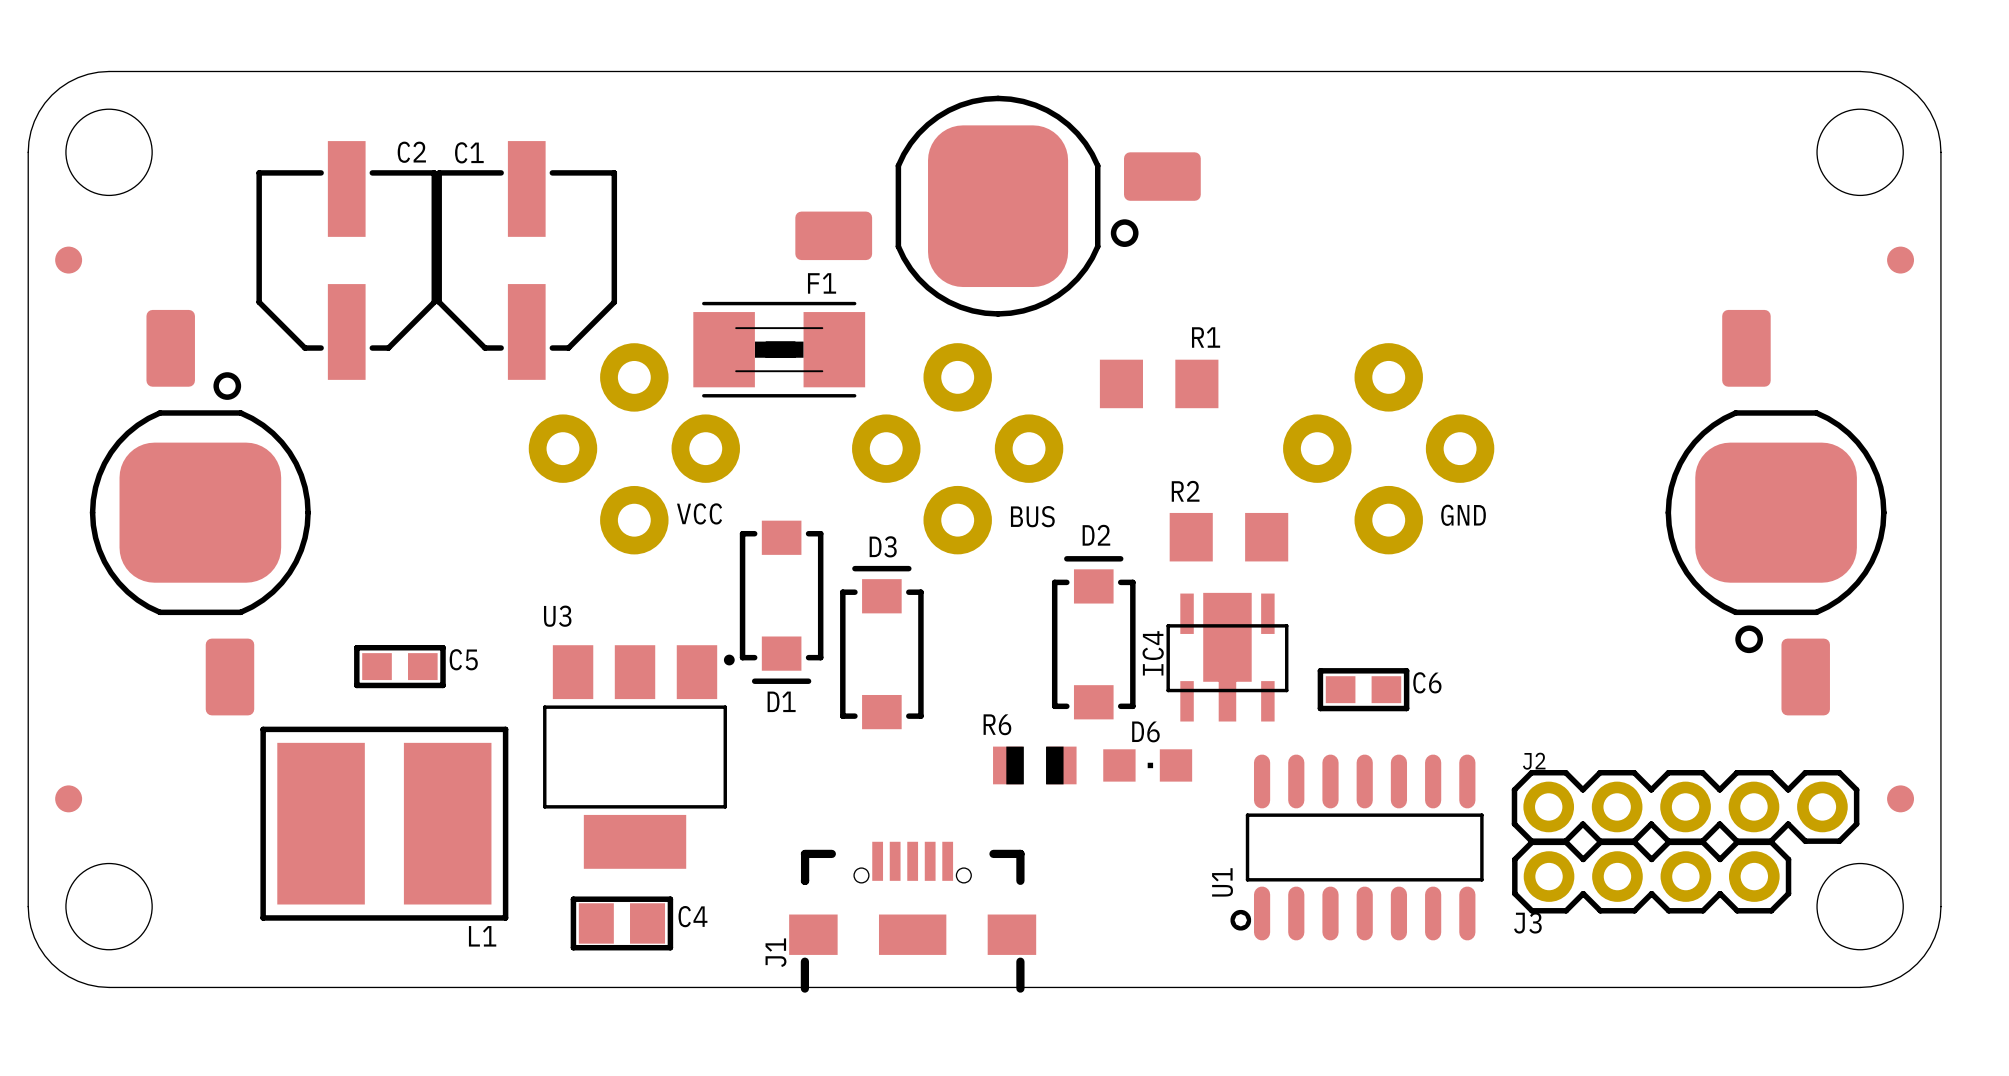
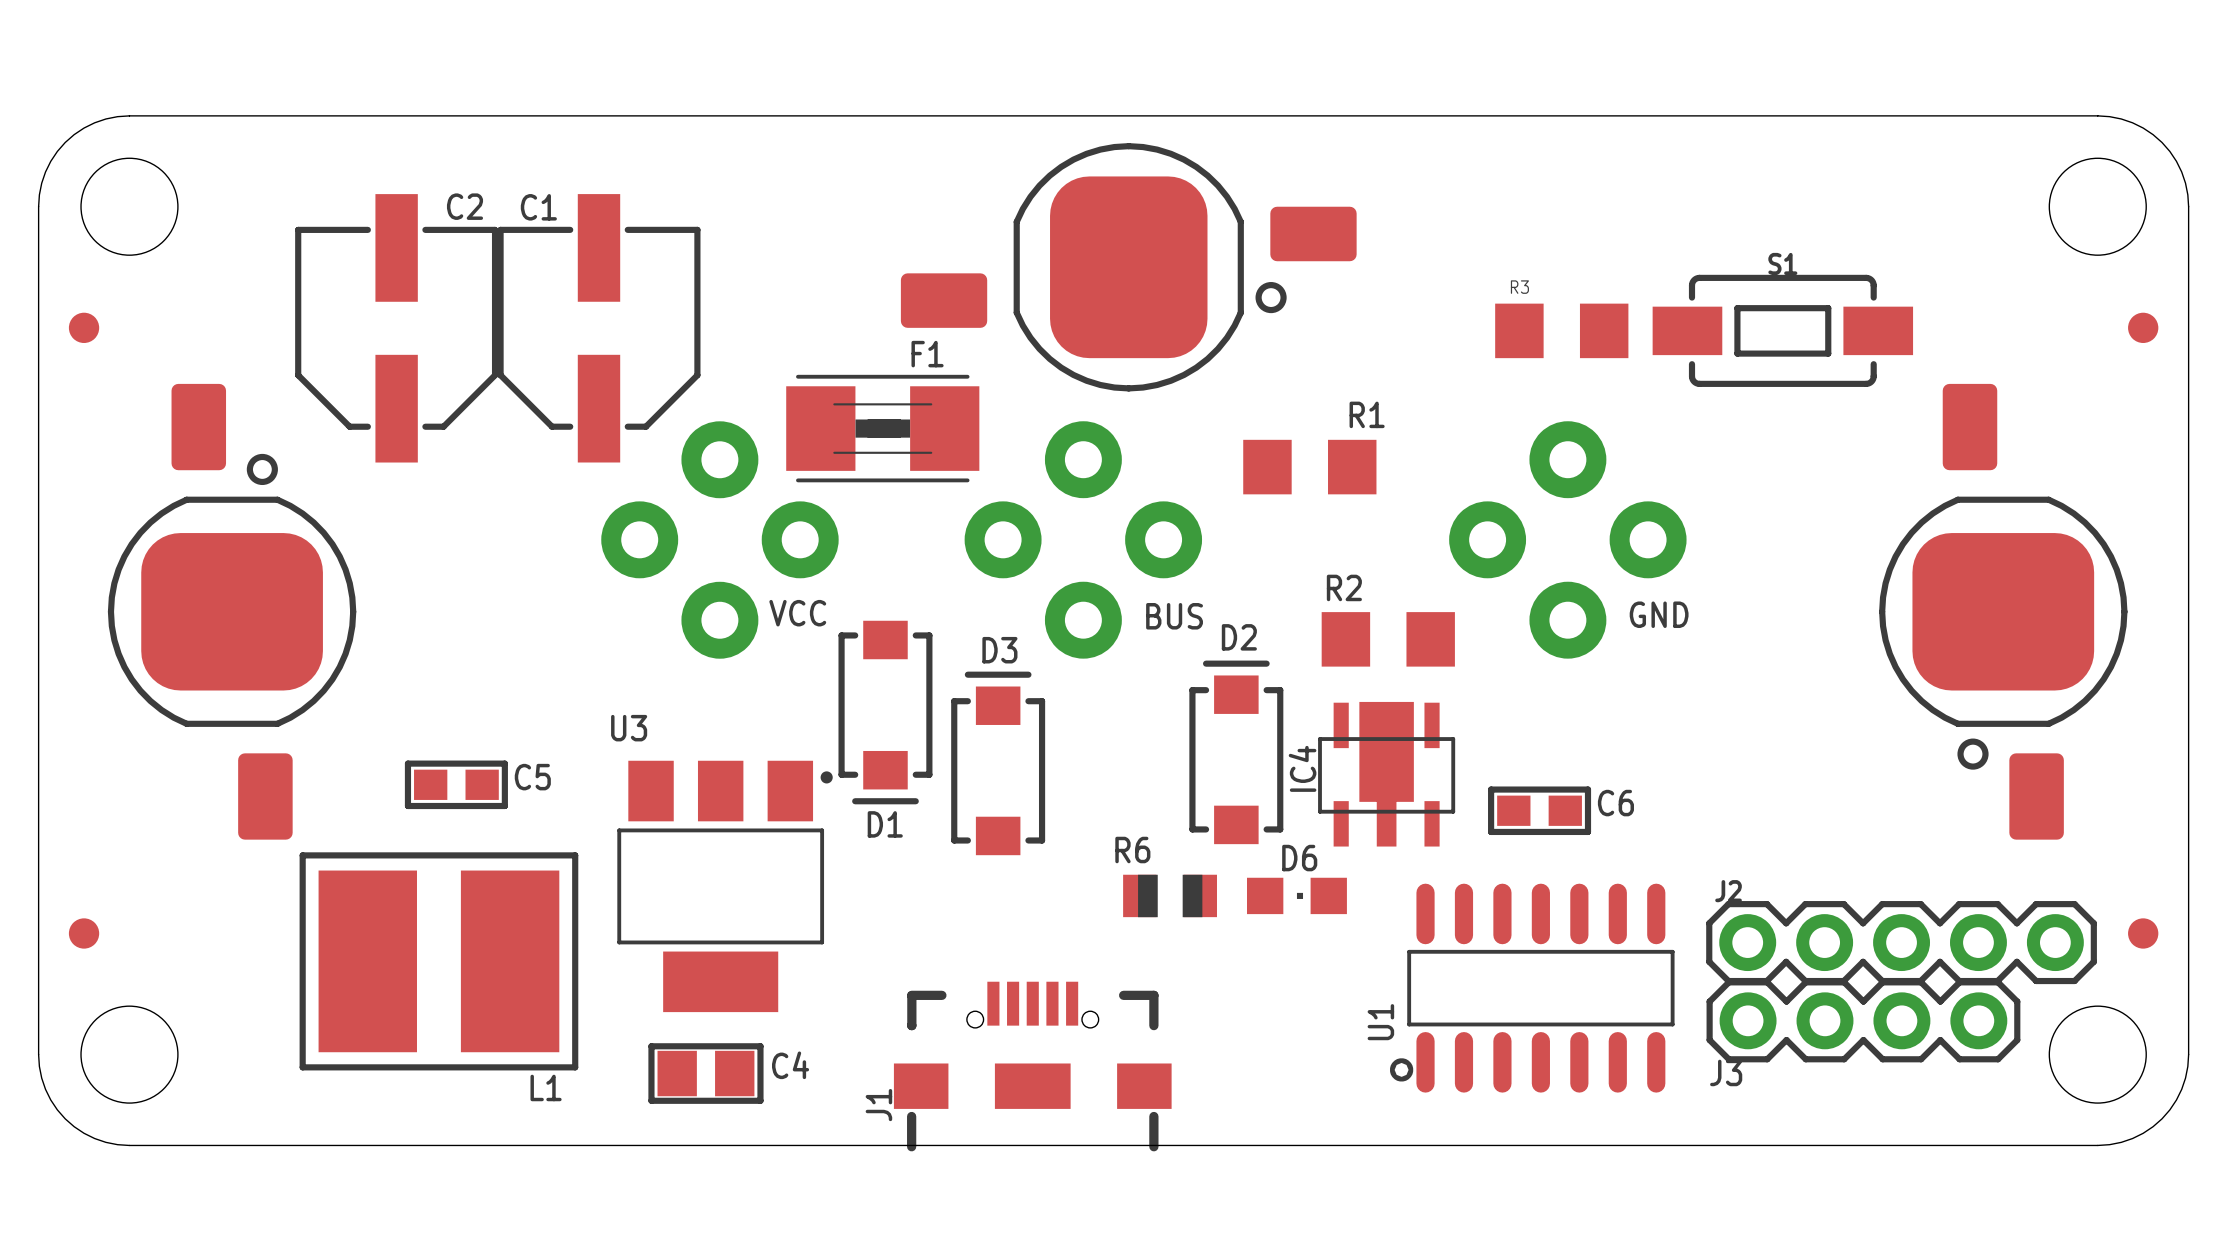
R3: none -> (1561, 330)
S1: none -> (1782, 330)

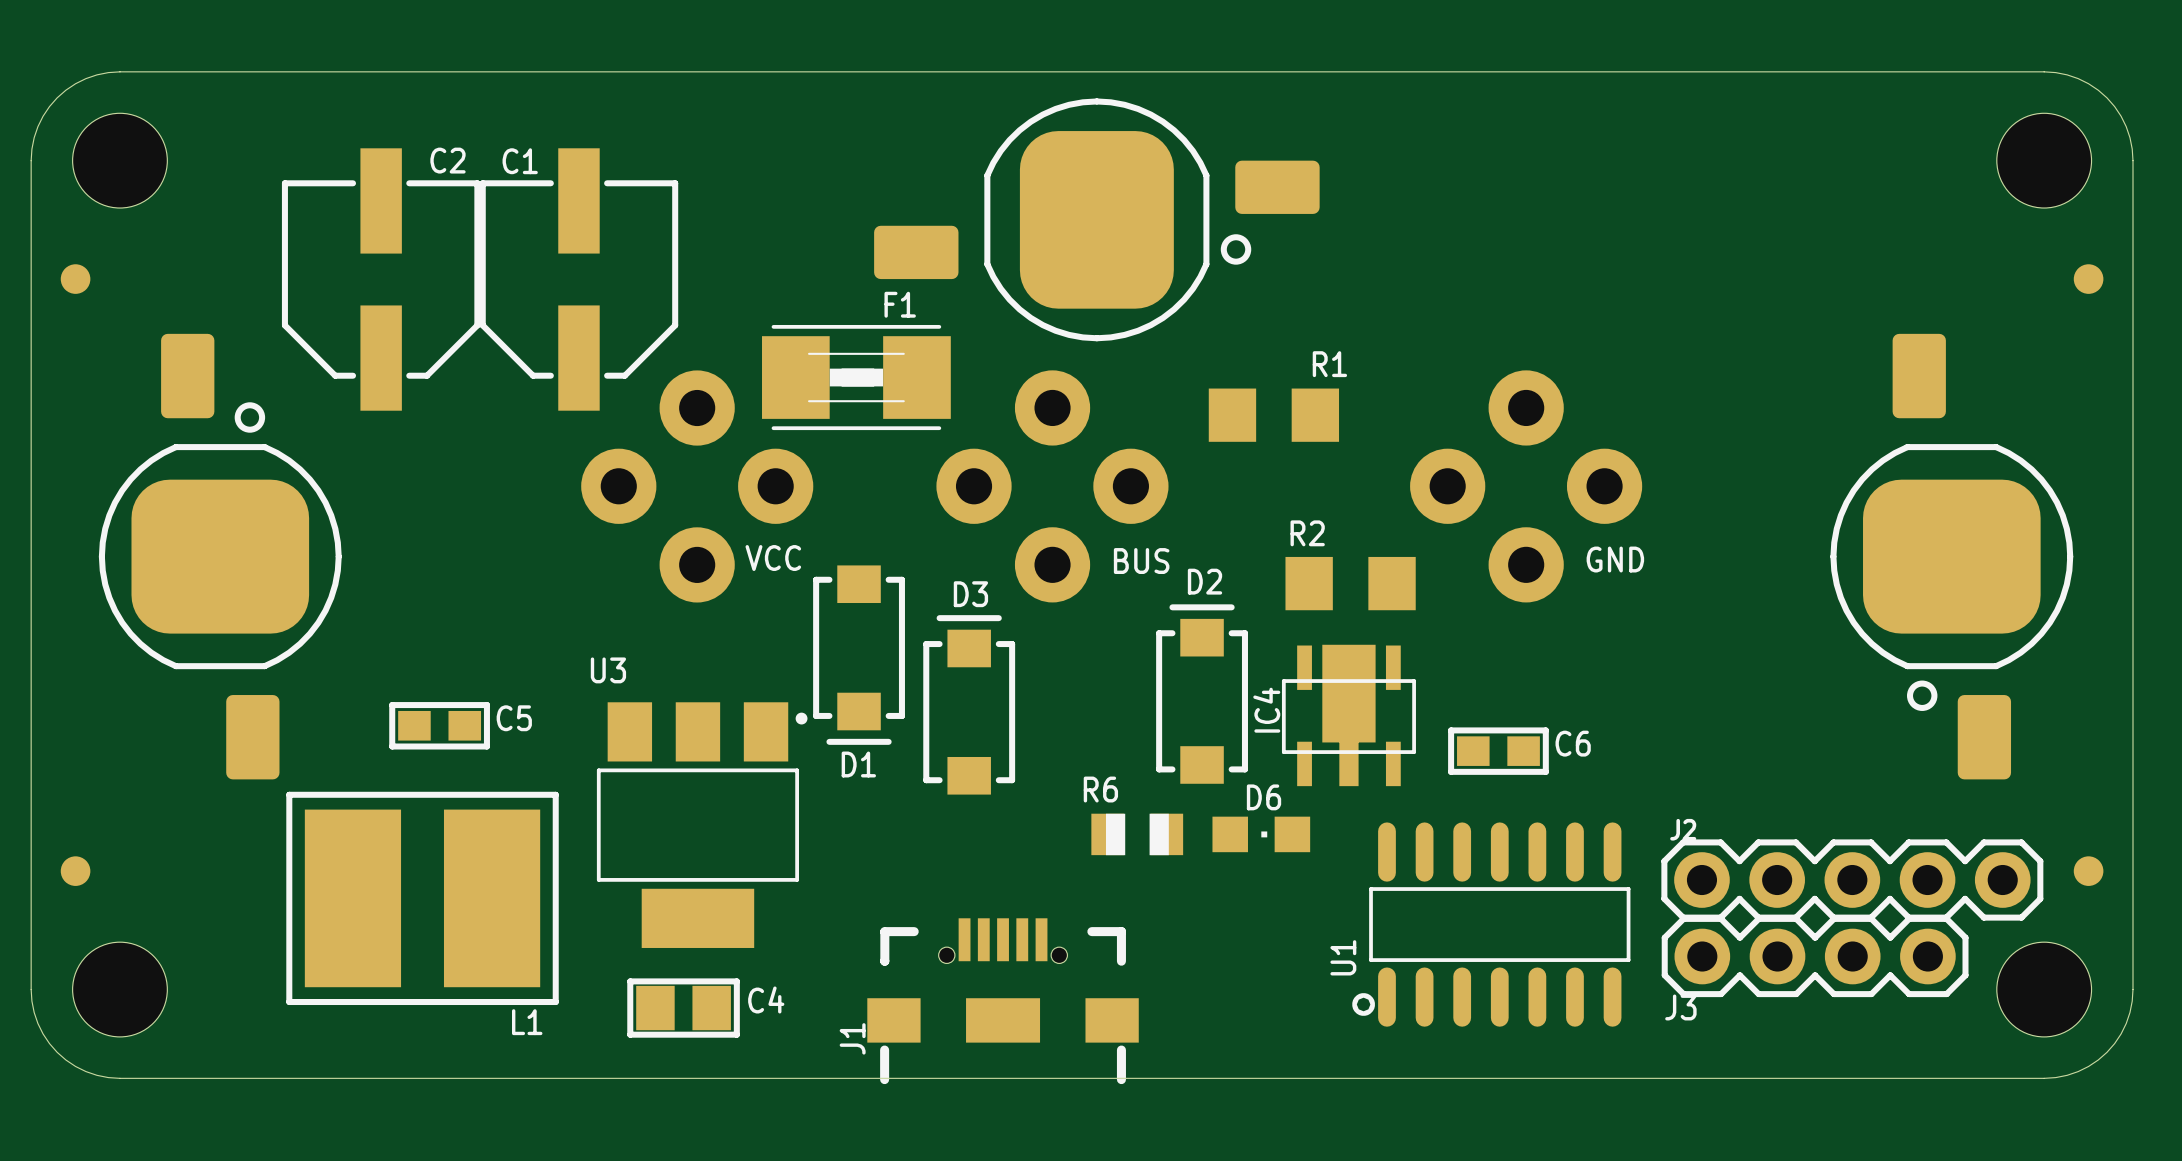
R3: (1561, 330) -> none
S1: (1782, 330) -> none

